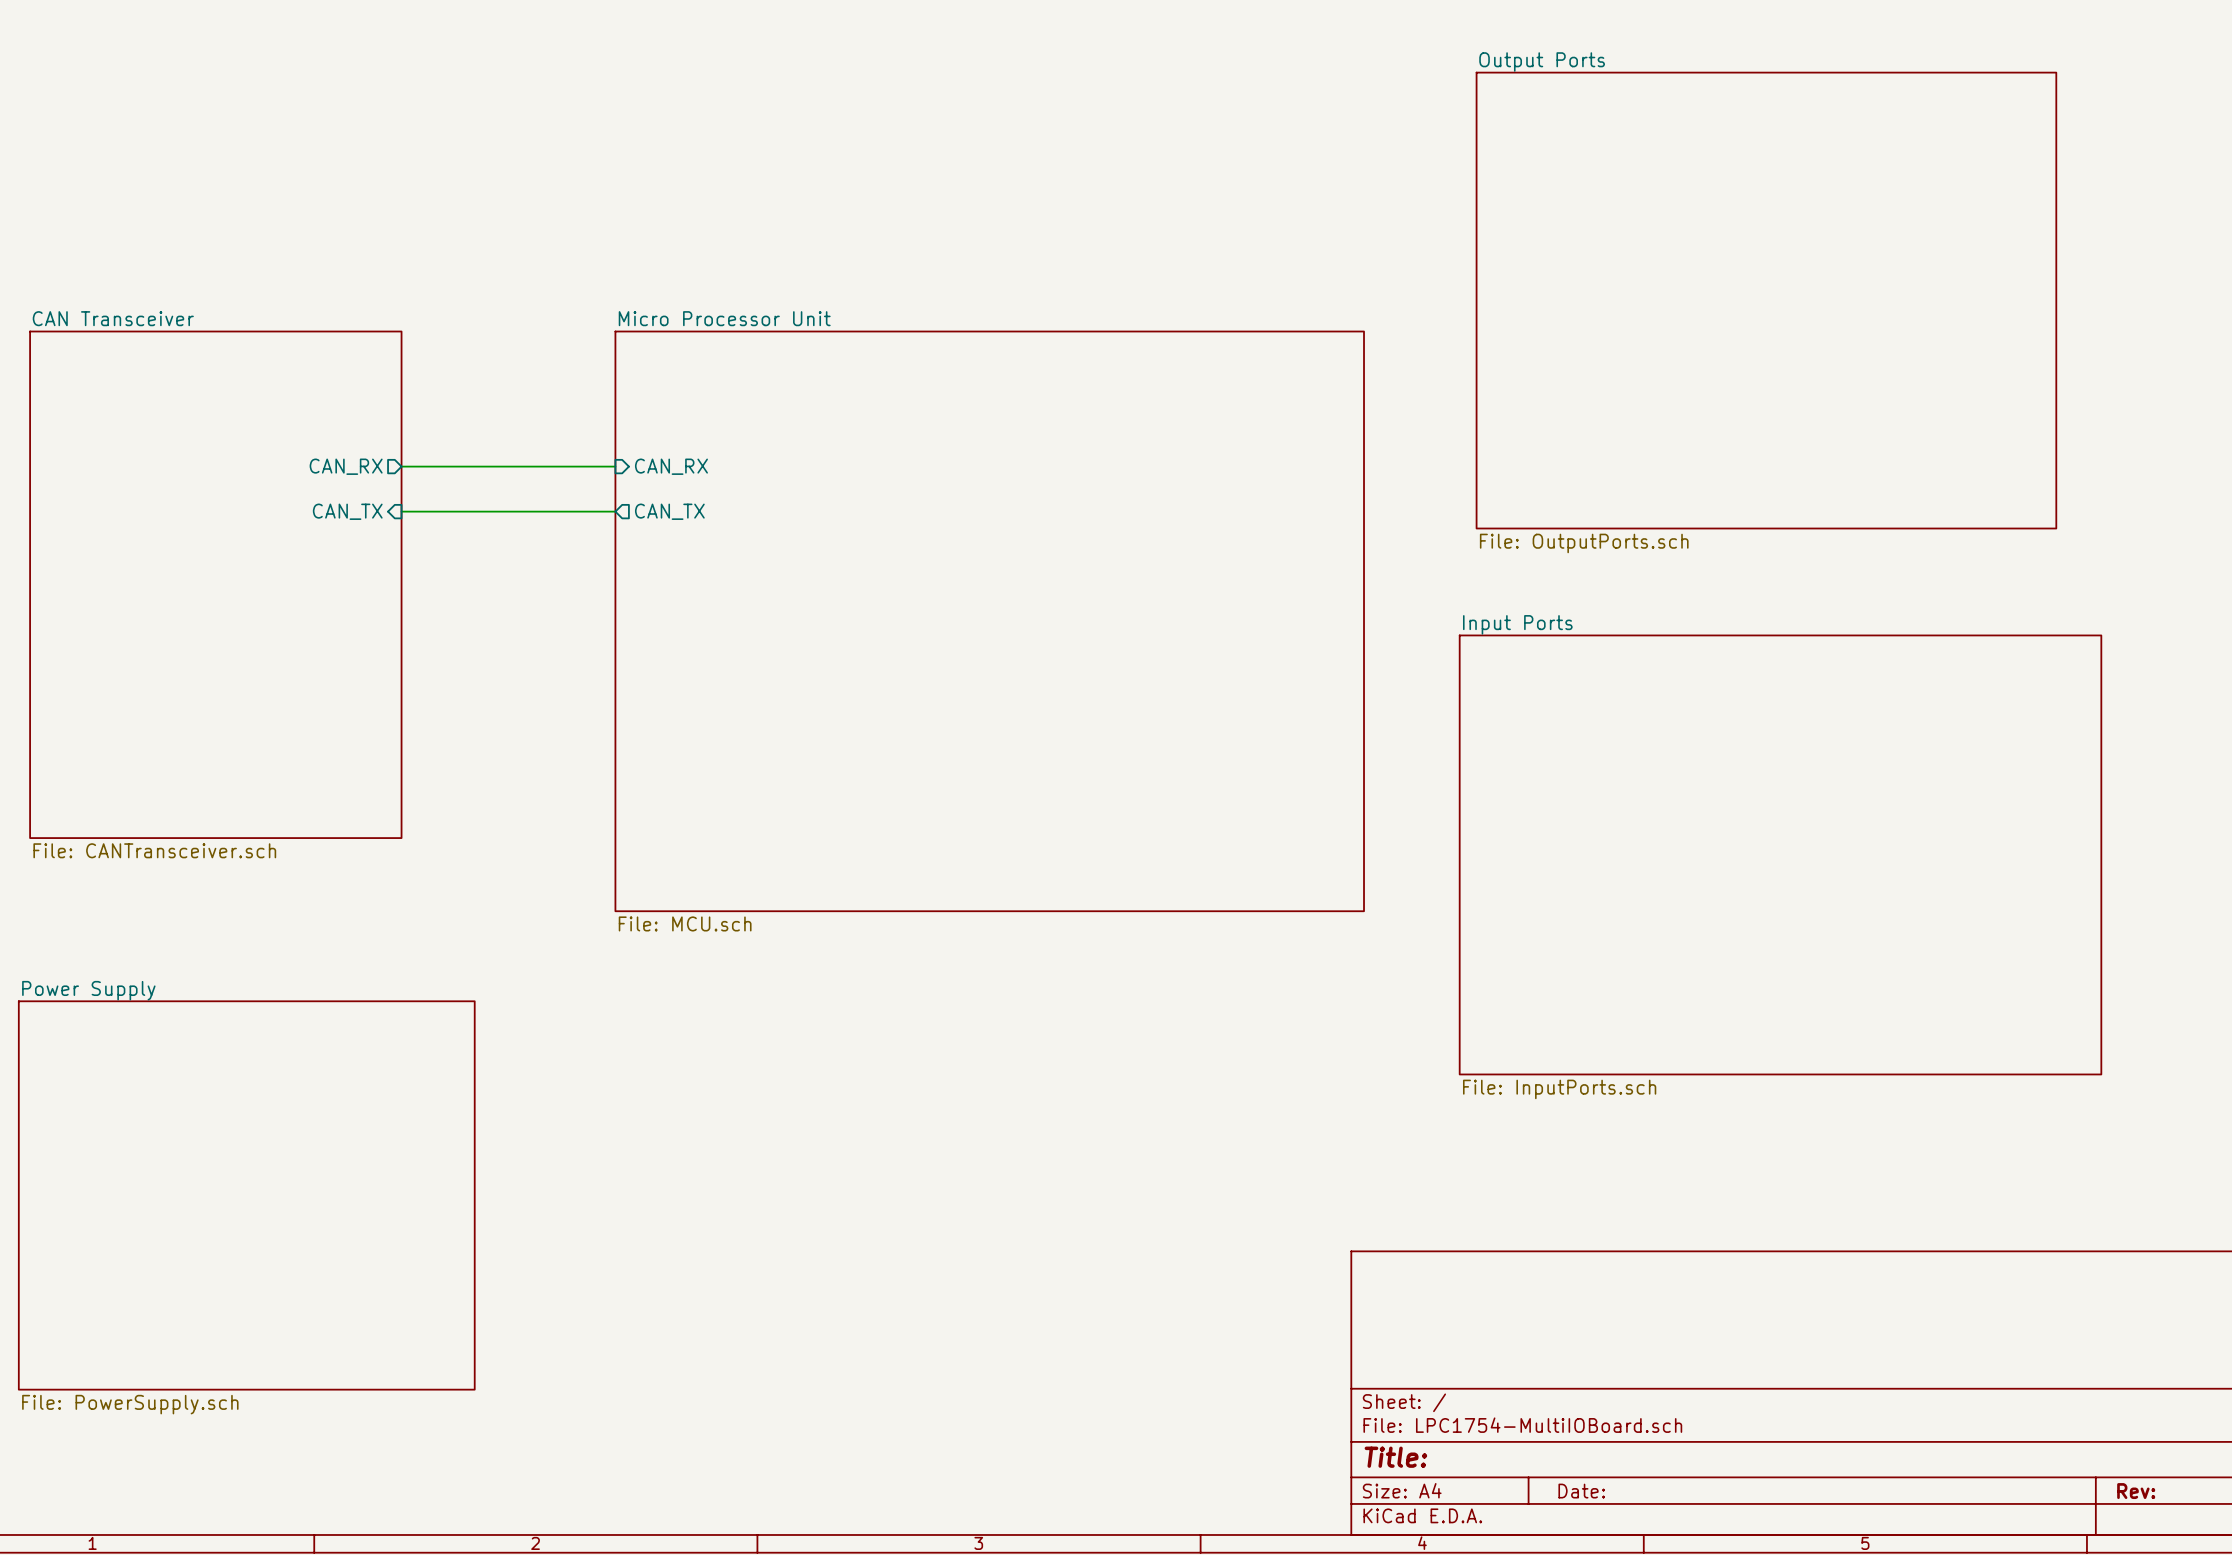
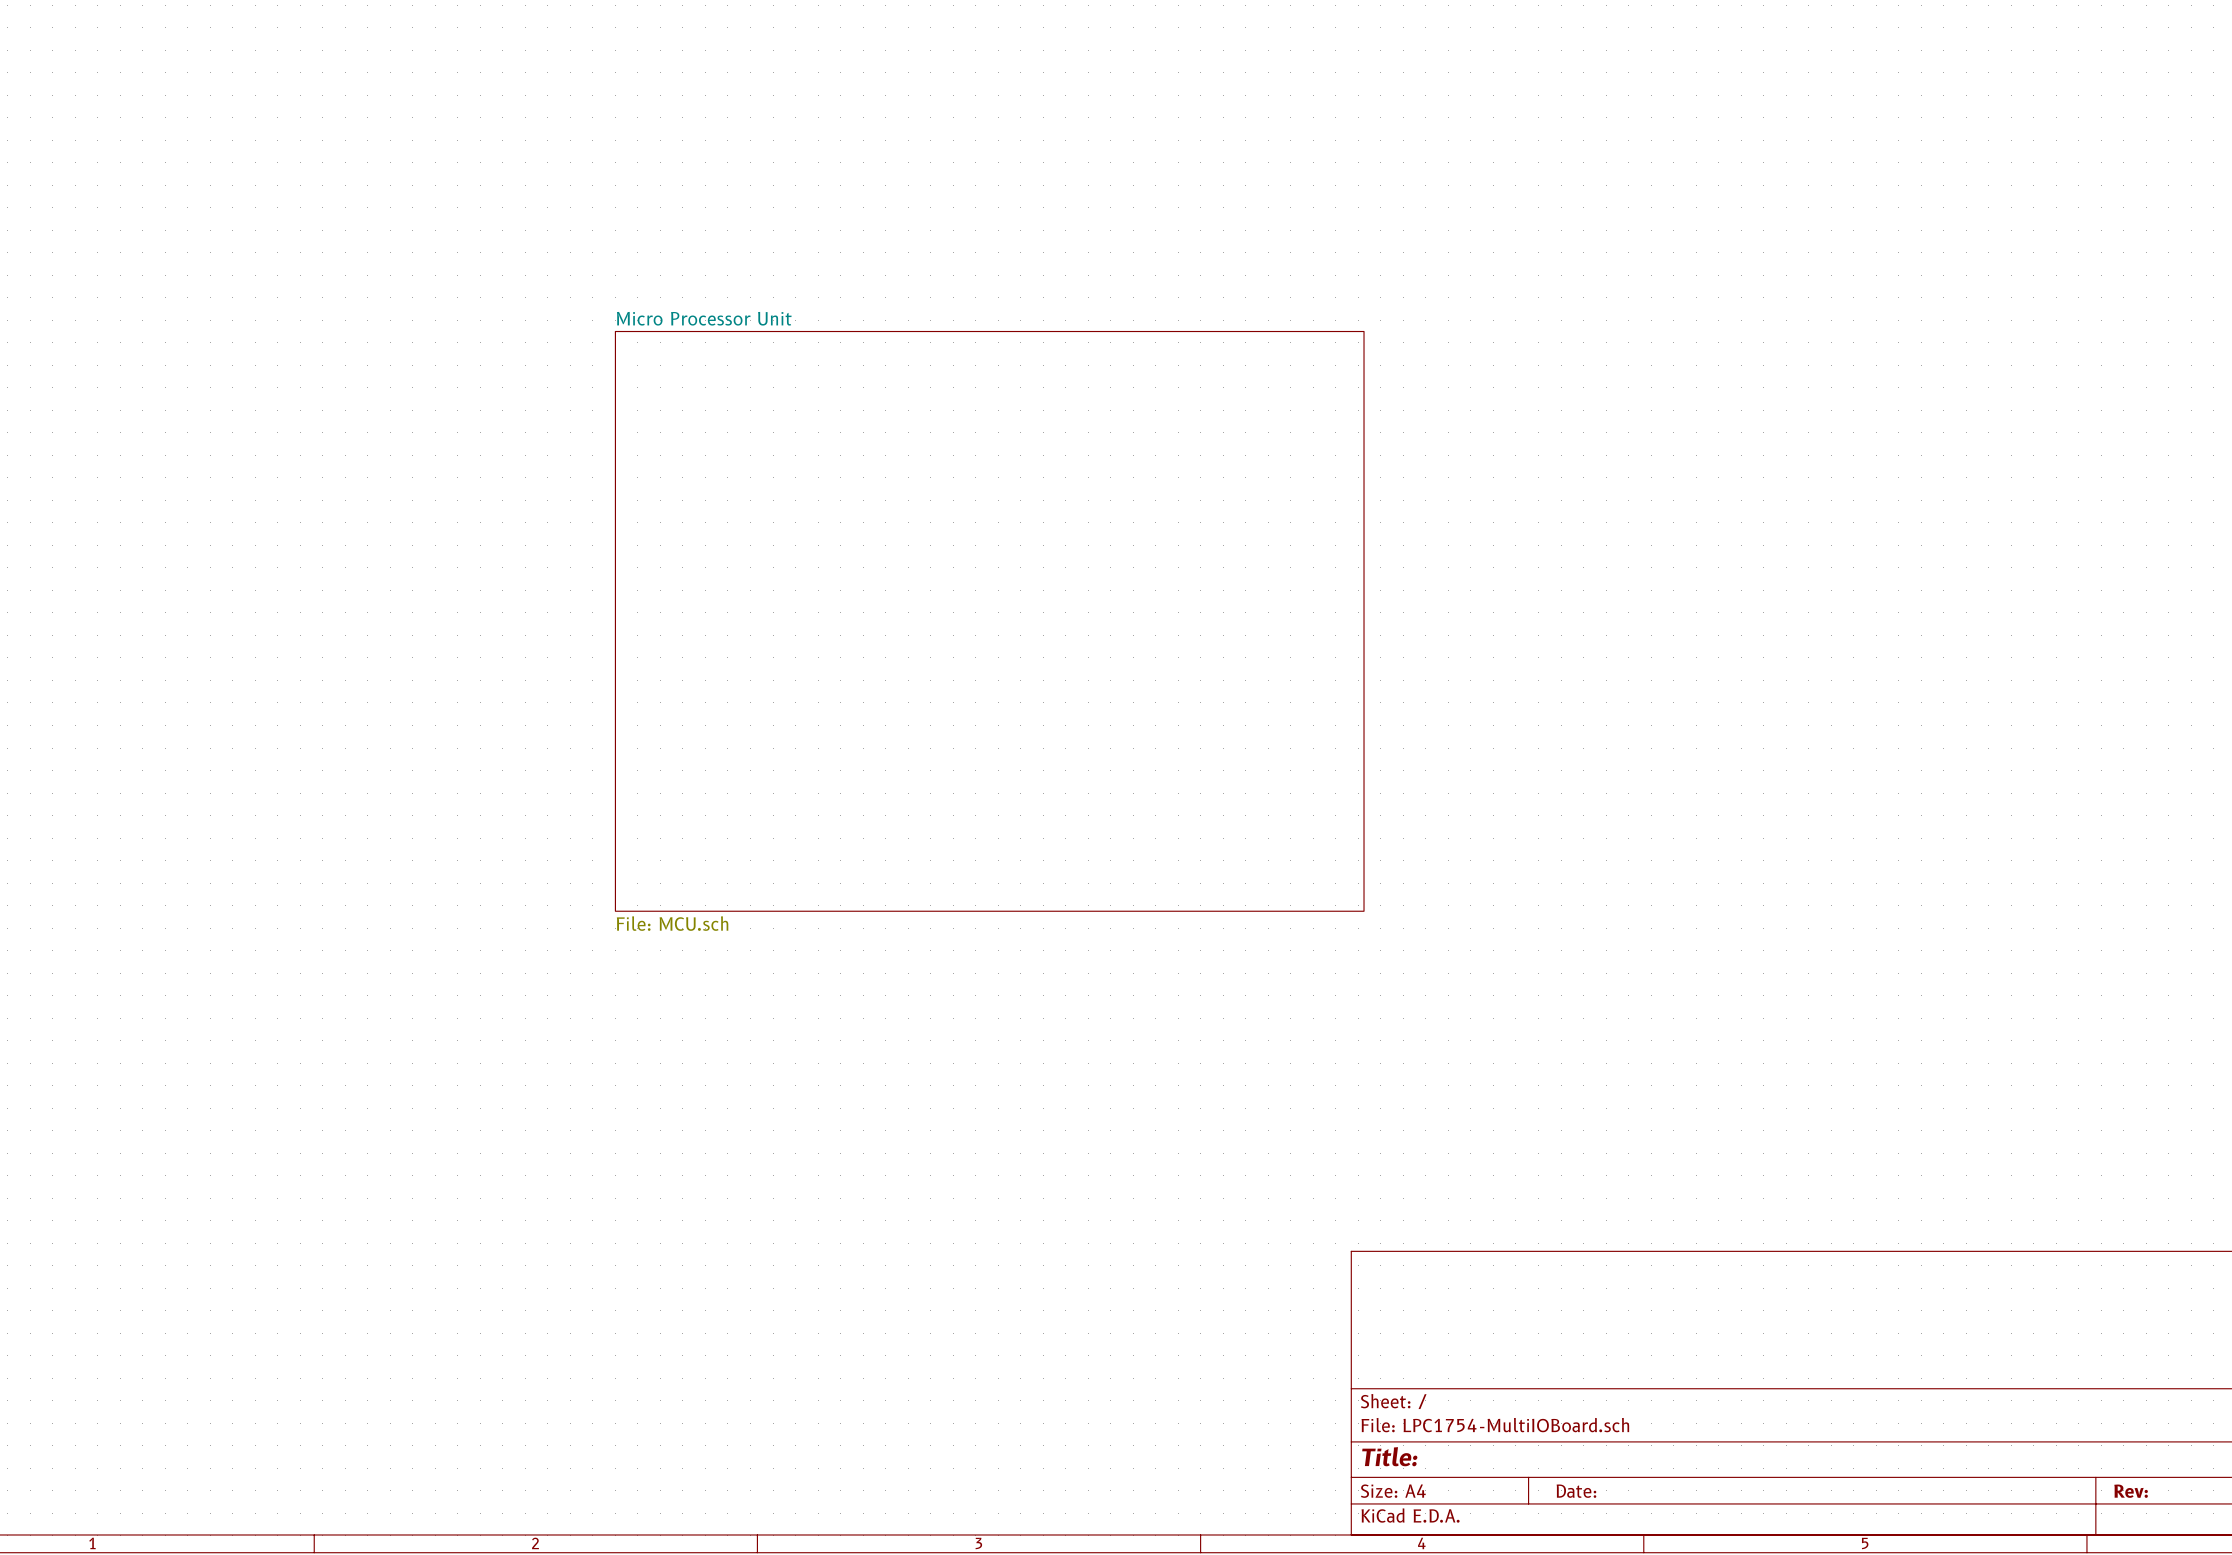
sheet Output Ports: File: OutputPorts.sch (1766, 300) -> none
sheet pin: CAN_RX (346, 466) -> none
wire: (401, 466) (615, 466) -> none
sheet pin: CAN_RX (671, 466) -> none
sheet pin: CAN_TX (347, 511) -> none
wire: (401, 511) (615, 511) -> none
sheet pin: CAN_TX (669, 511) -> none
sheet CAN Transceiver: File: CANTransceiver.sch (215, 584) -> none
sheet Input Ports: File: InputPorts.sch (1780, 854) -> none
sheet Power Supply: File: PowerSupply.sch (246, 1195) -> none

